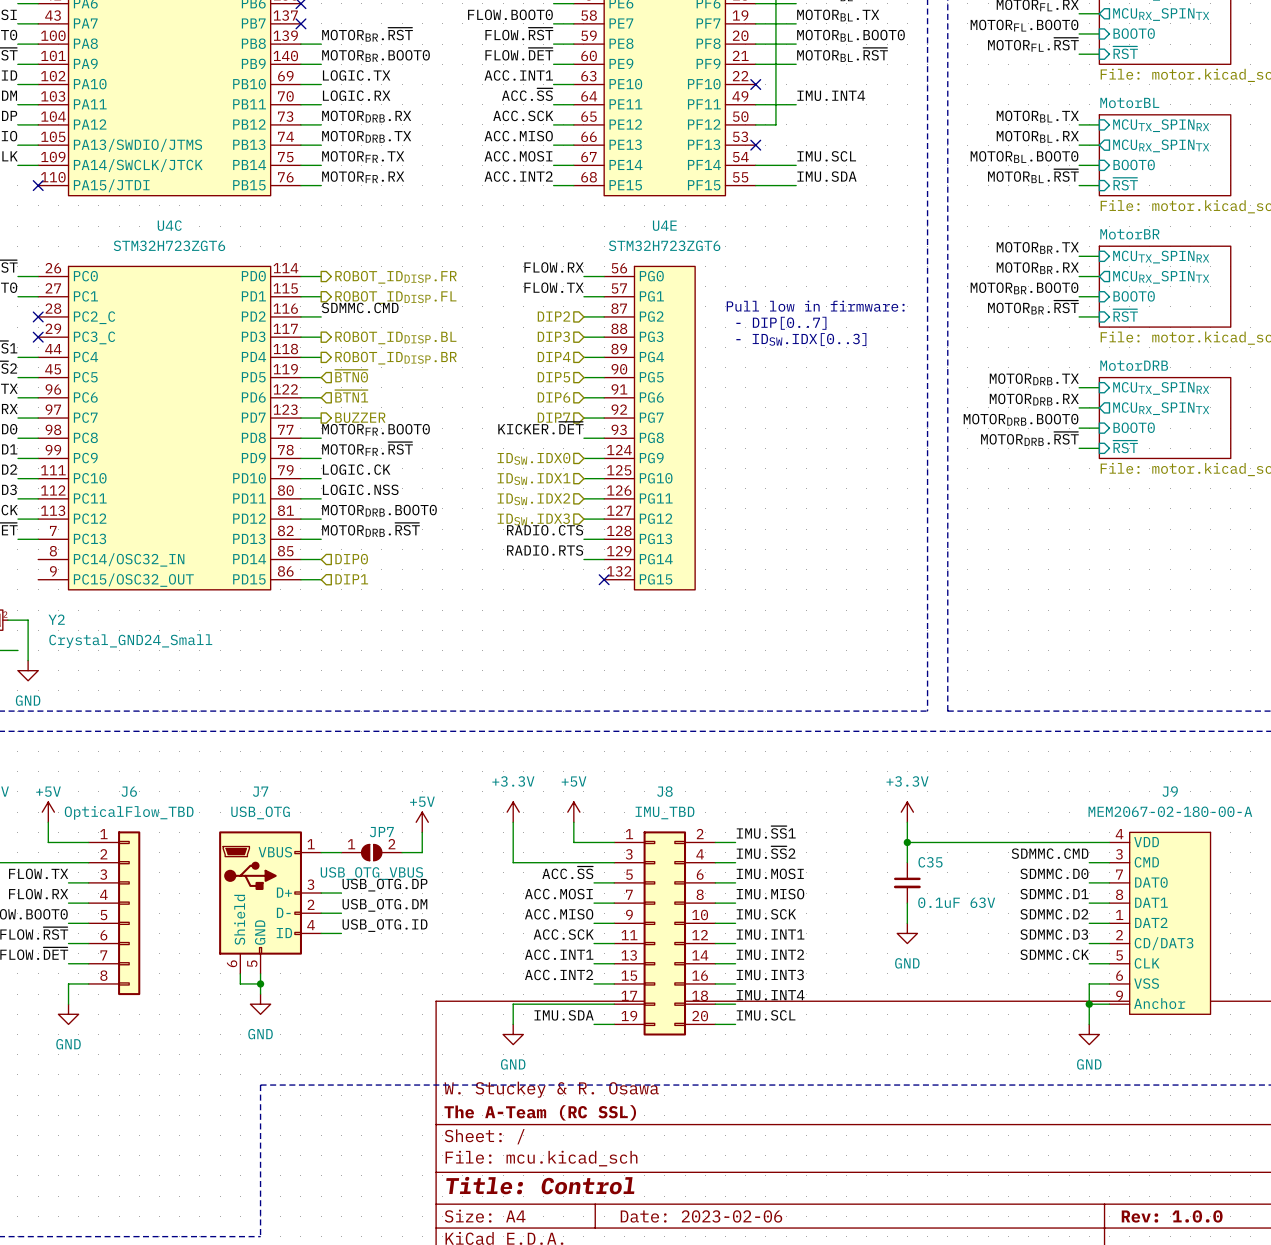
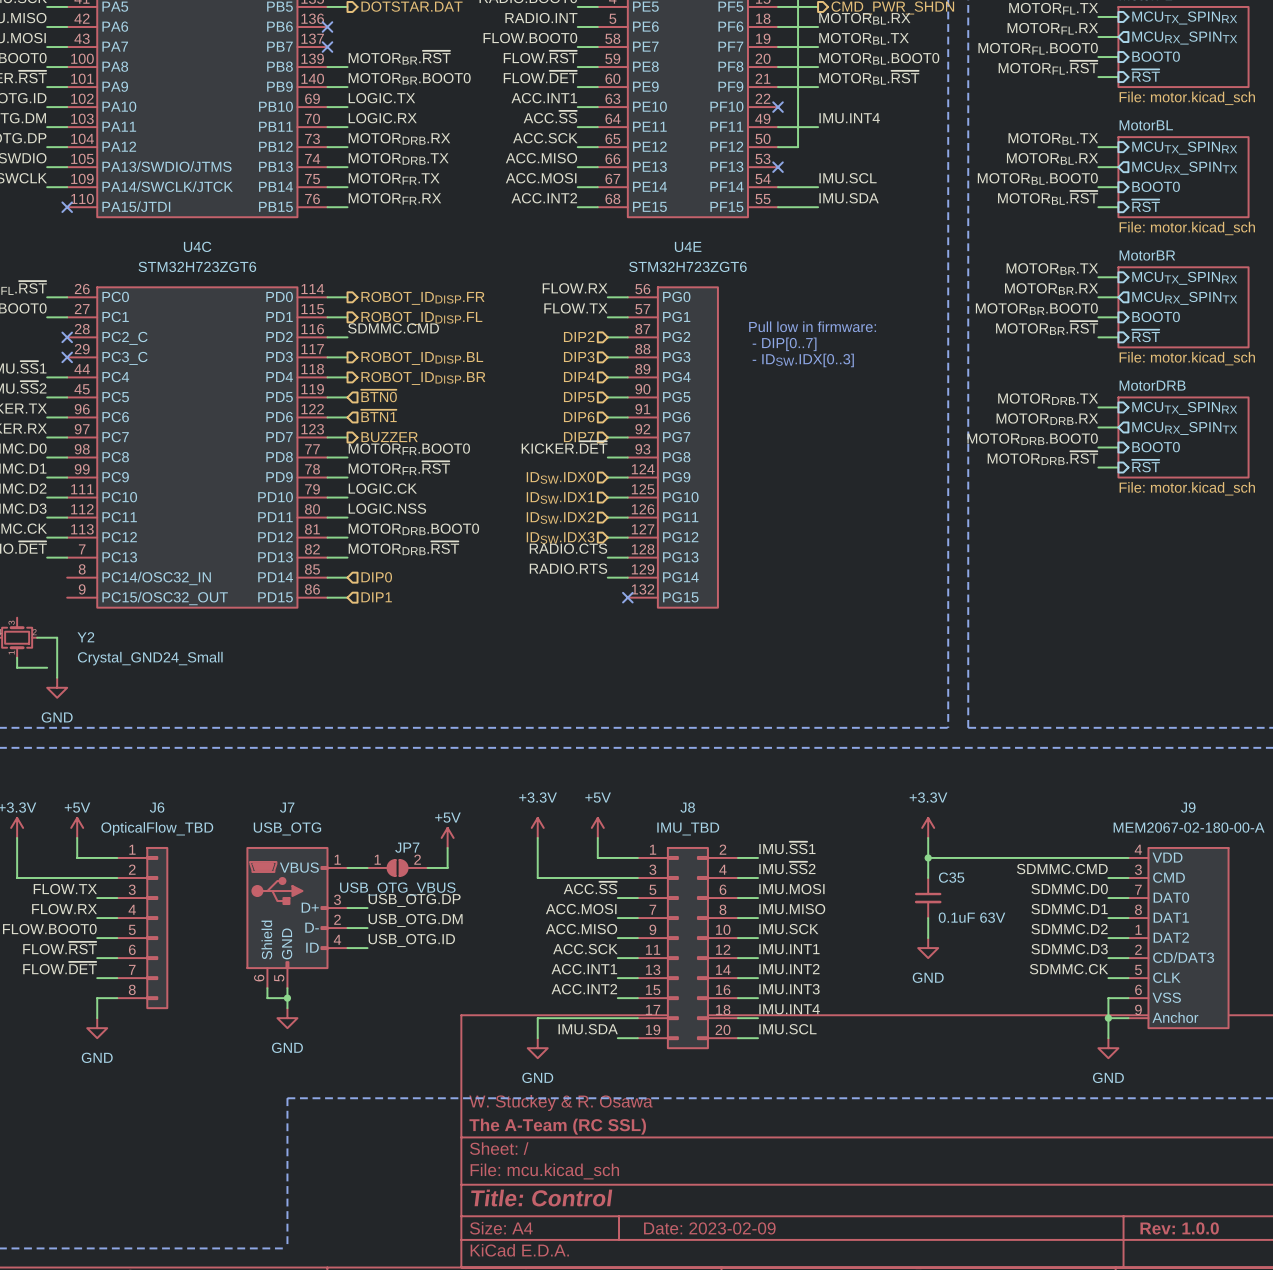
title block: Date: 2023-02-06 (701, 1216) -> Date: 2023-02-09 (709, 1228)

